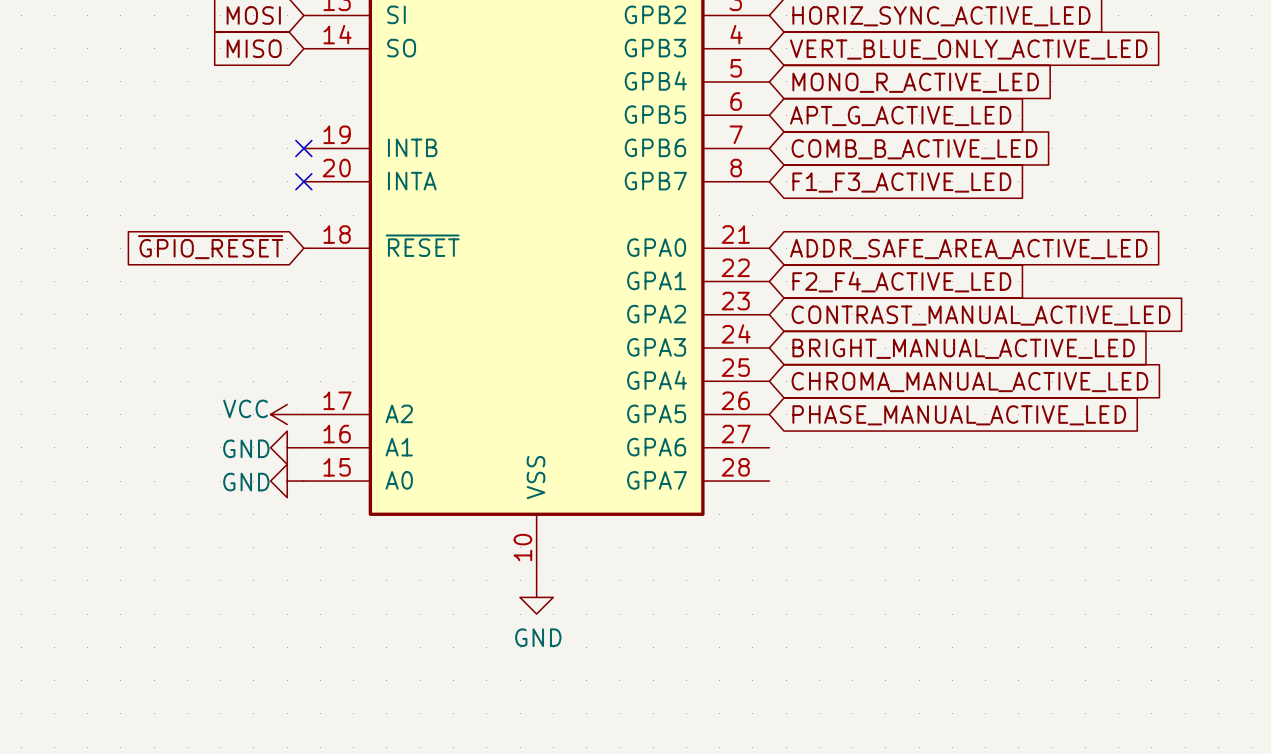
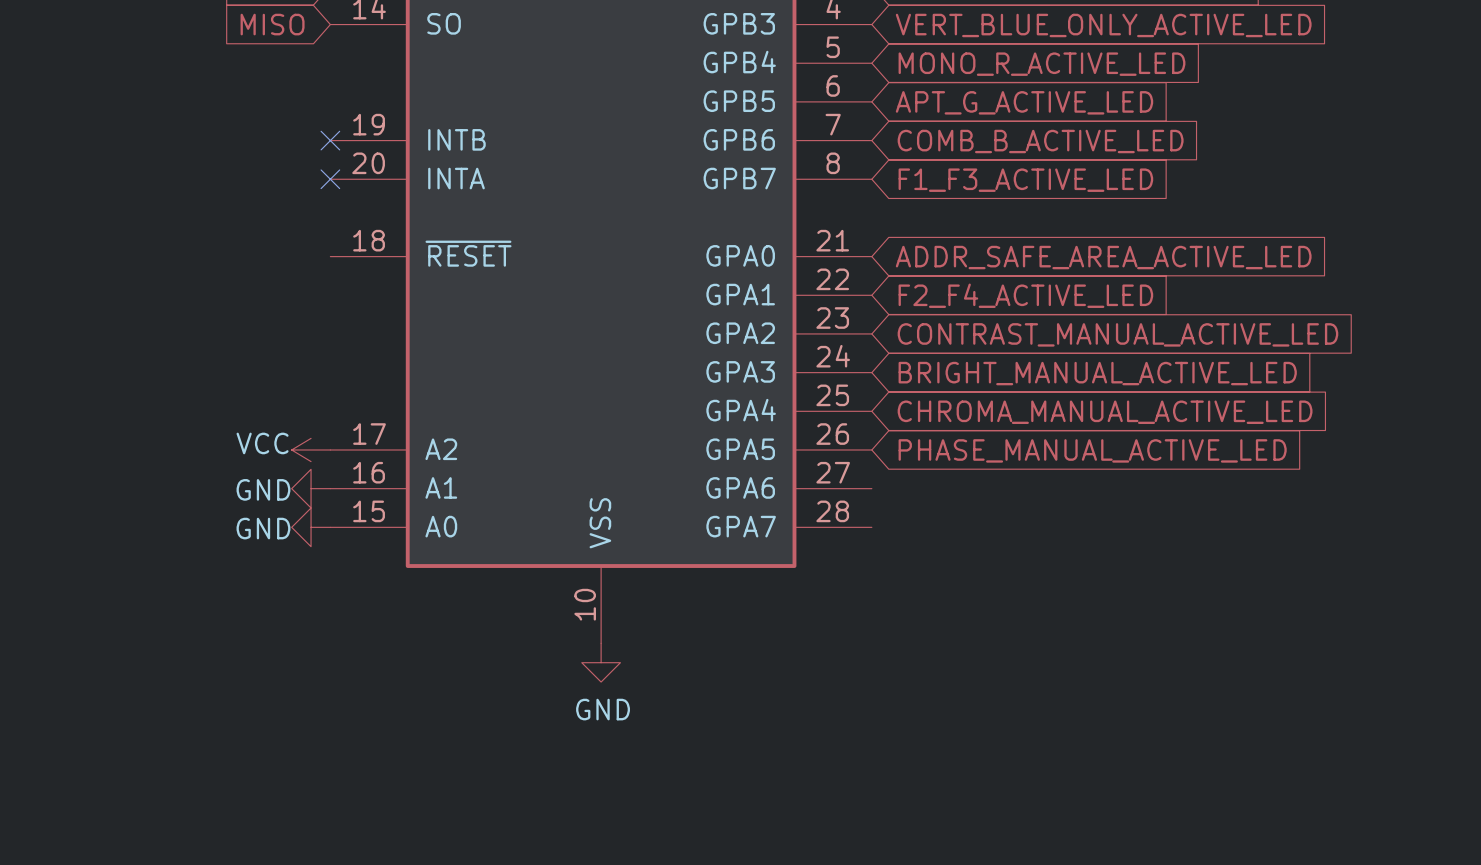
global label: ~{GPIO_RESET} (210, 247) -> none

